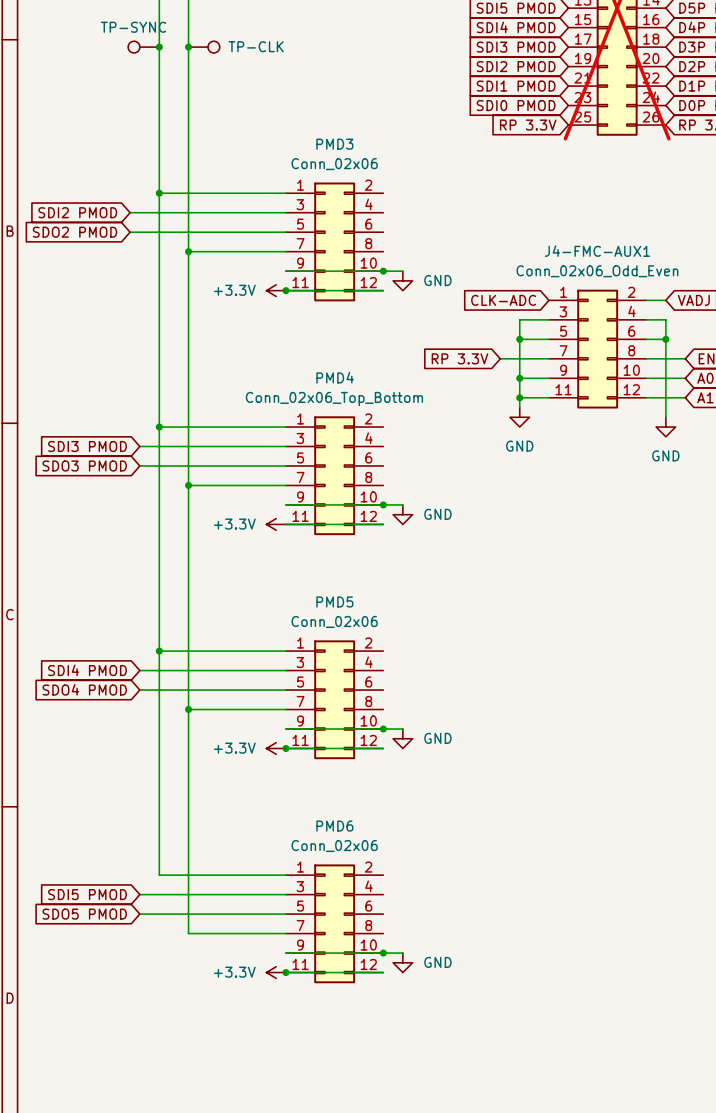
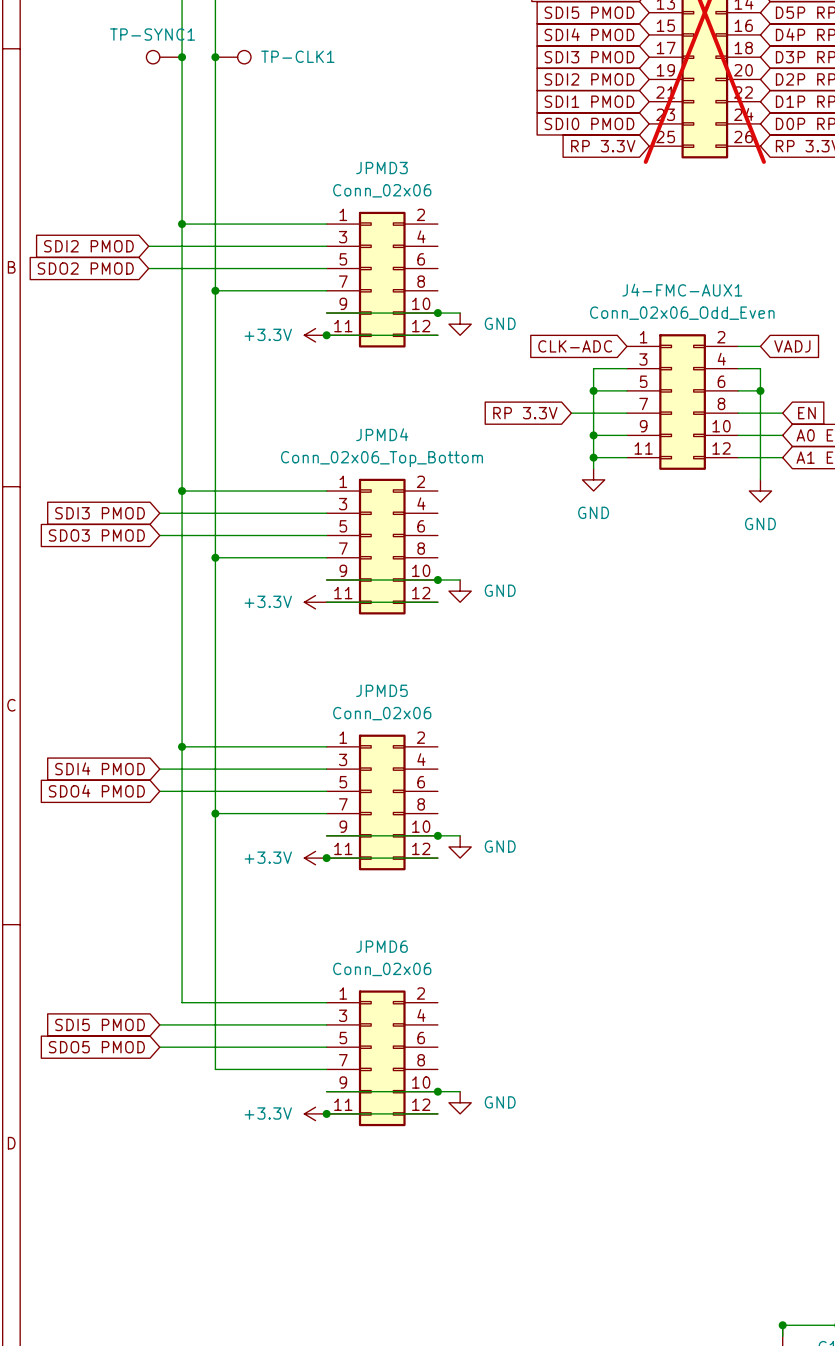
TP-SYNC name: TP-SYNC (133, 27) -> TP-SYNC1 (152, 34)
TP-CLK name: TP-CLK (256, 46) -> TP-CLK1 (297, 56)
PMD3 name: PMD3 (334, 144) -> JPMD3 (381, 168)
PMD4 name: PMD4 (335, 377) -> JPMD4 (382, 434)
PMD5 name: PMD5 (334, 602) -> JPMD5 (381, 690)
PMD6 name: PMD6 (334, 826) -> JPMD6 (381, 946)

